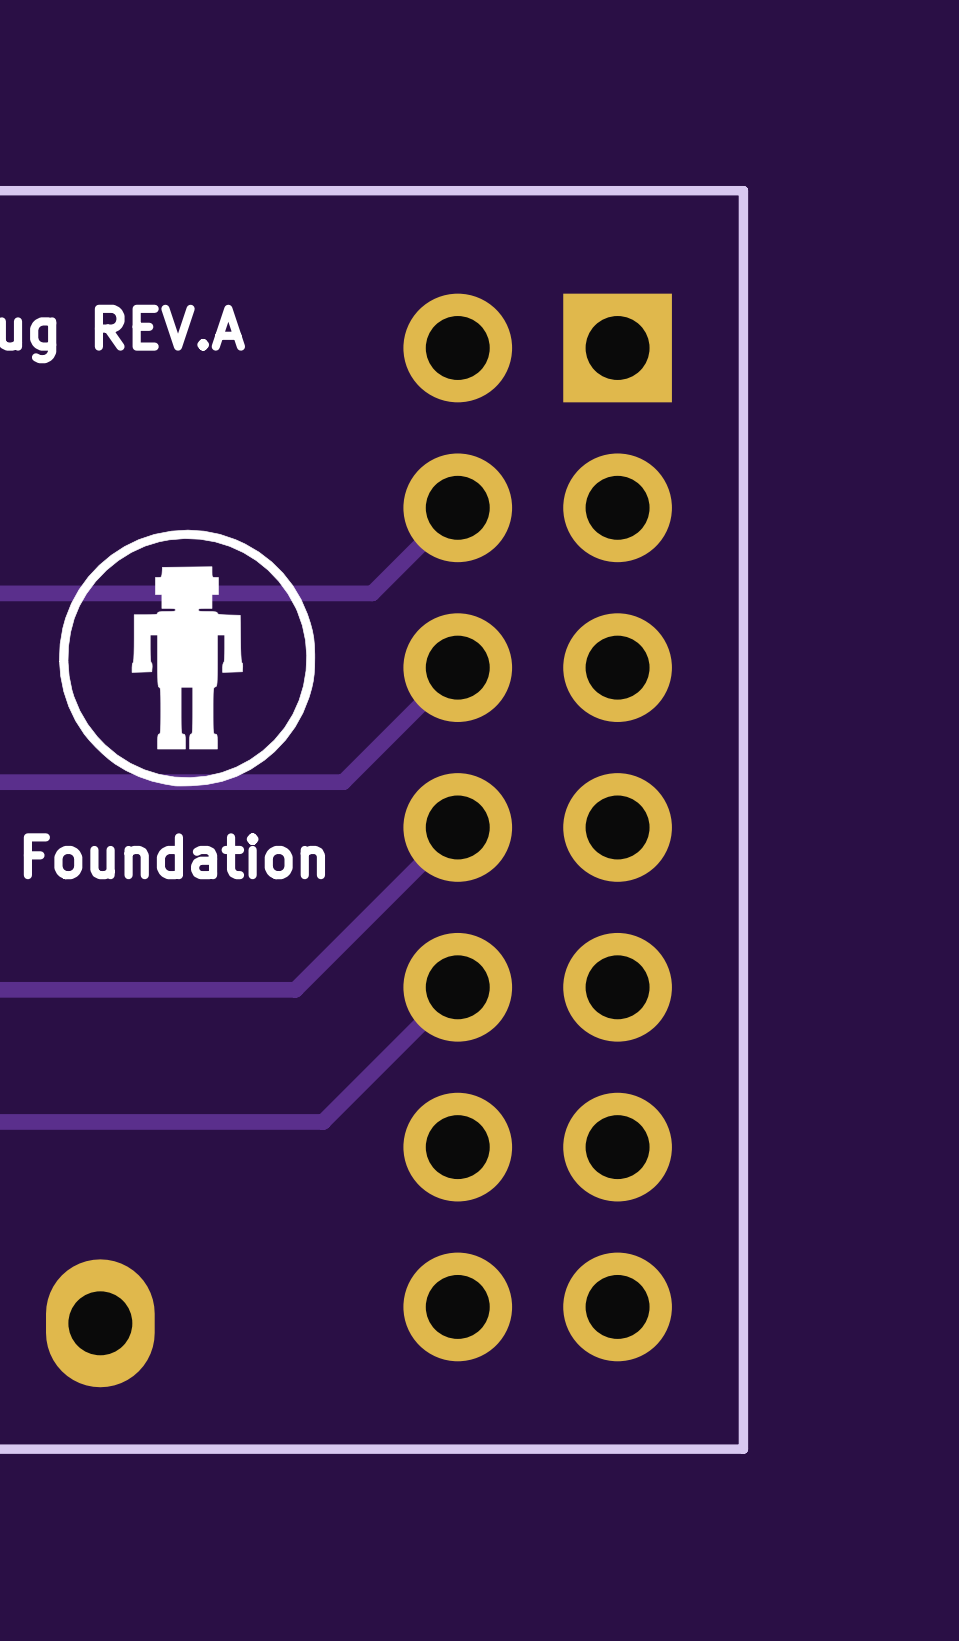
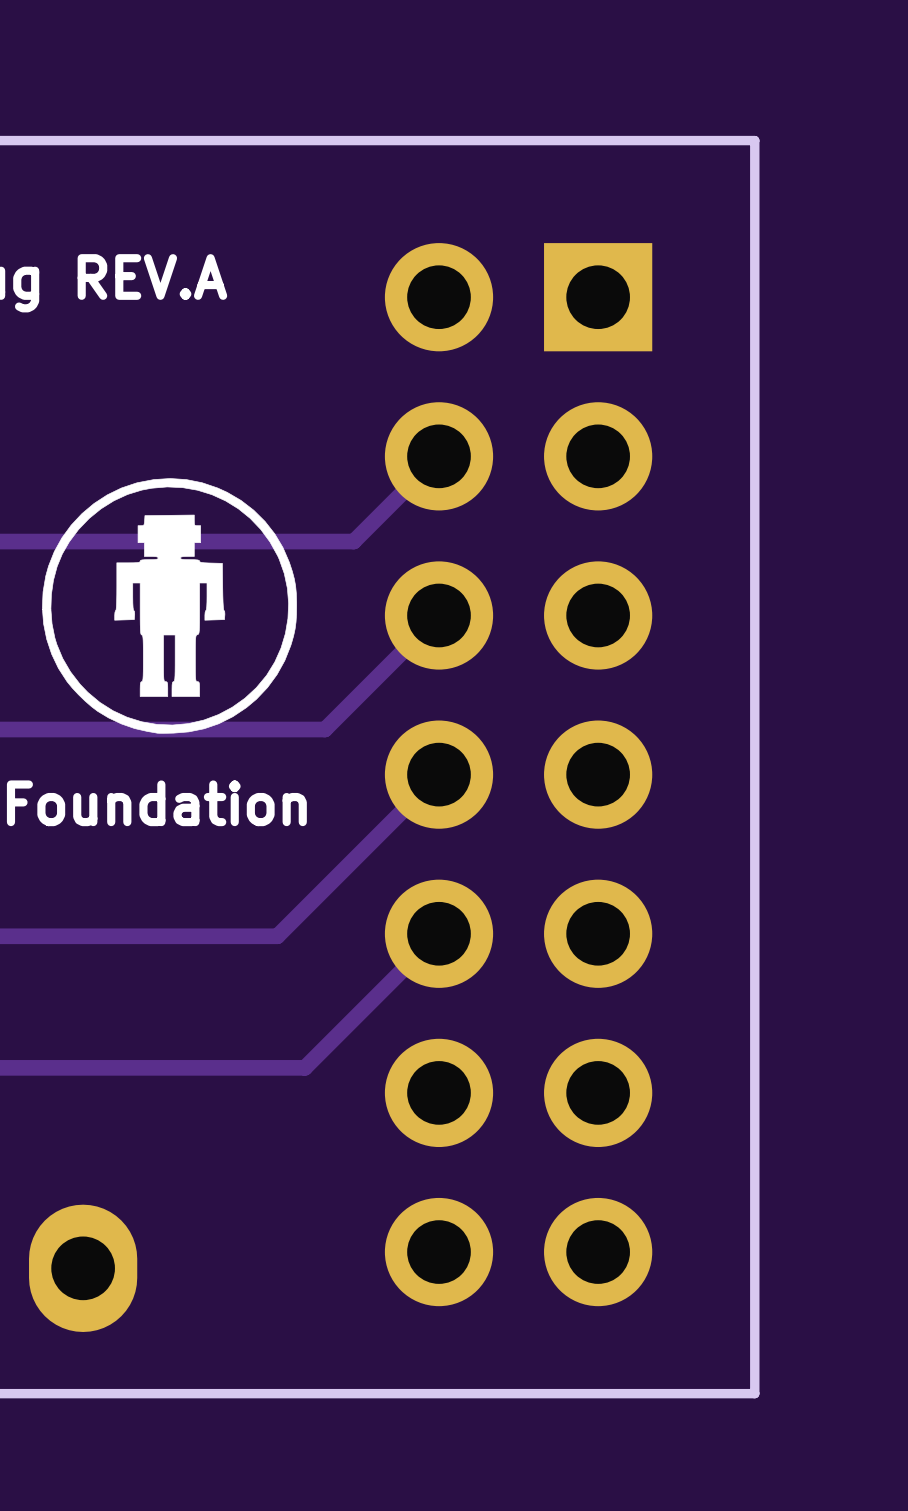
board edge: (743, 190) (743, 1449) -> (723, 140) (754, 140) (754, 1393) (723, 1393)

